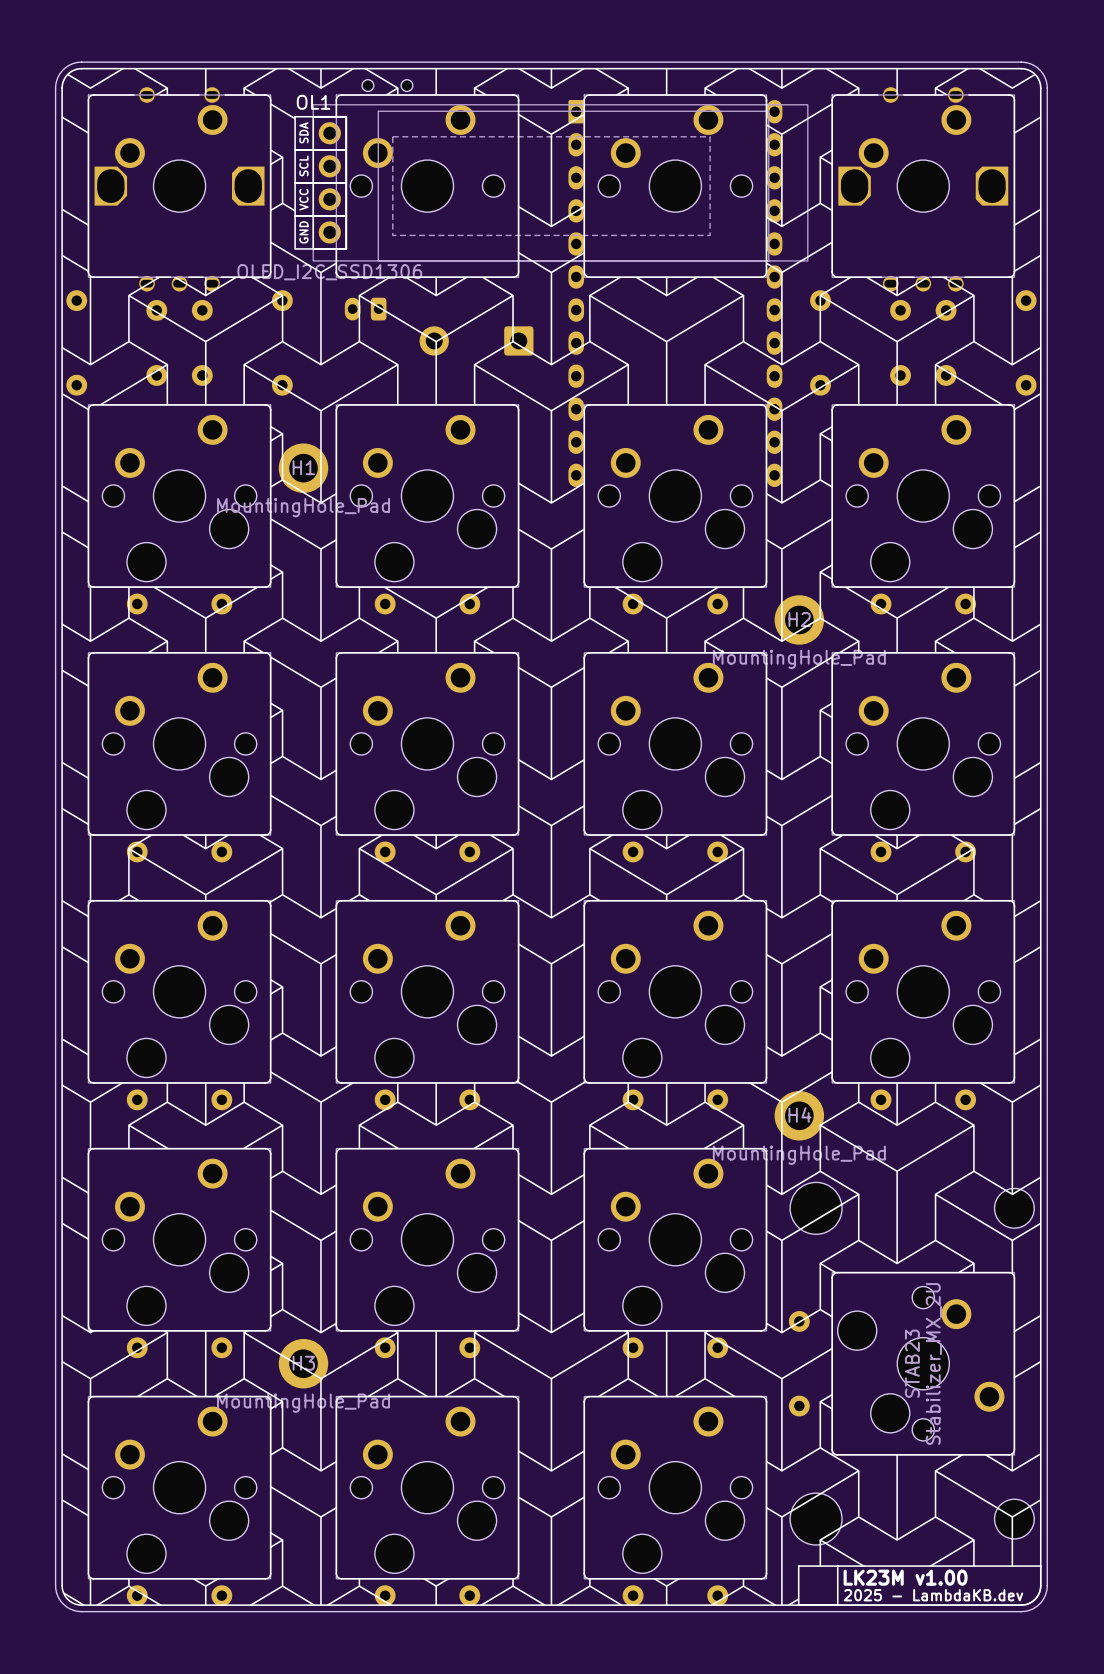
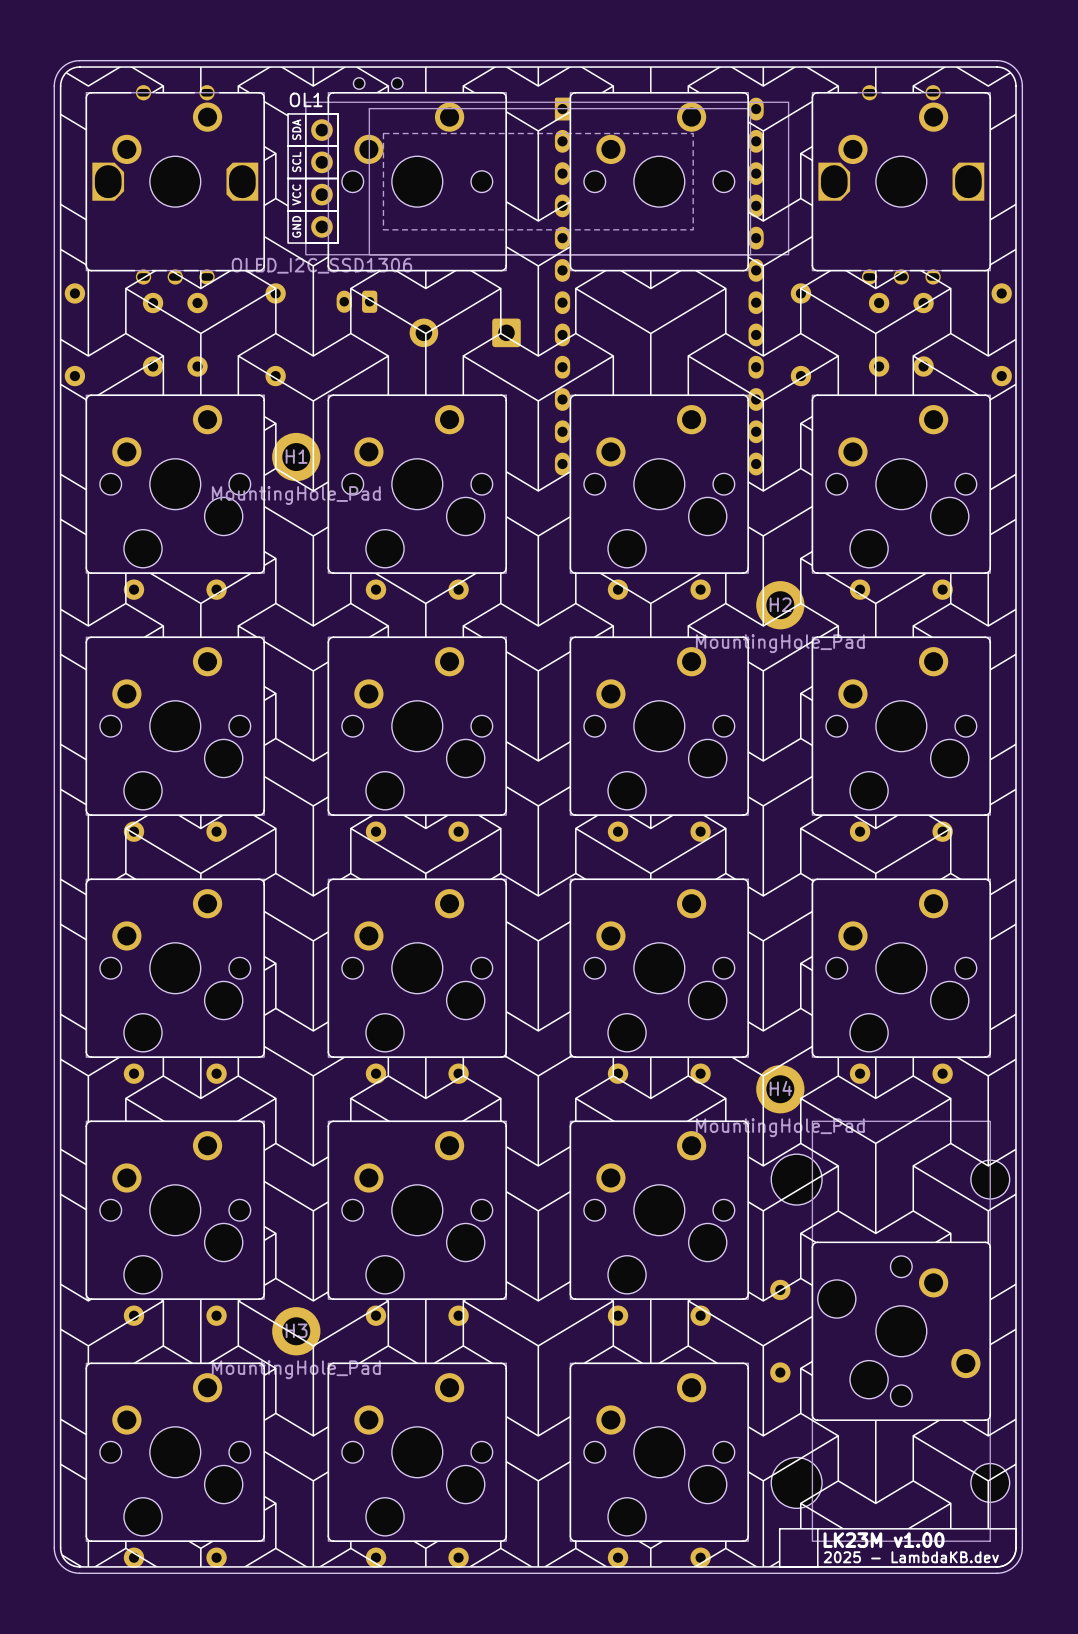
part footprint: [831, 1271, 1016, 1456] -> [771, 1121, 1010, 1542]
STAB23: Stabilizer_MX_2U (912, 1363) -> none

